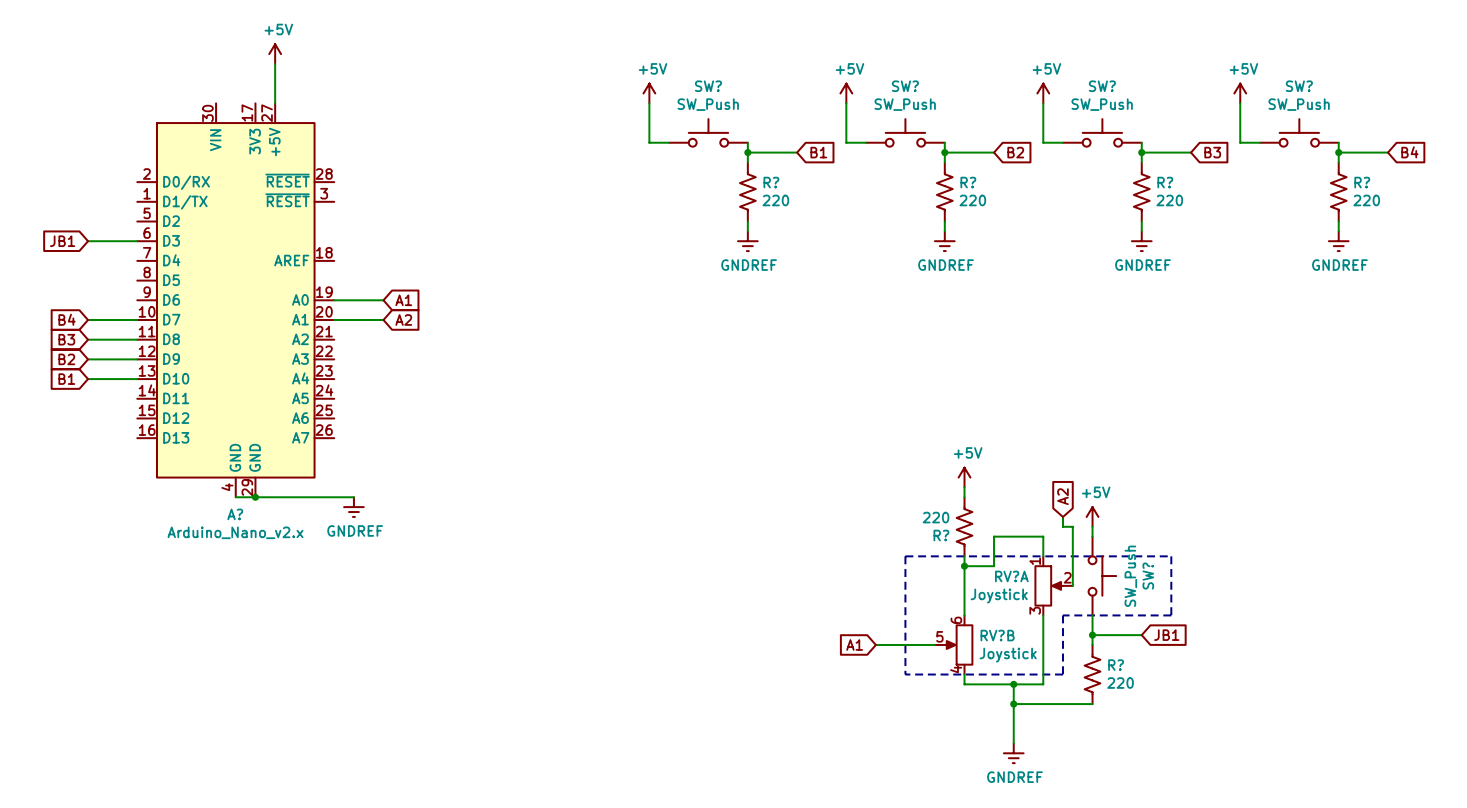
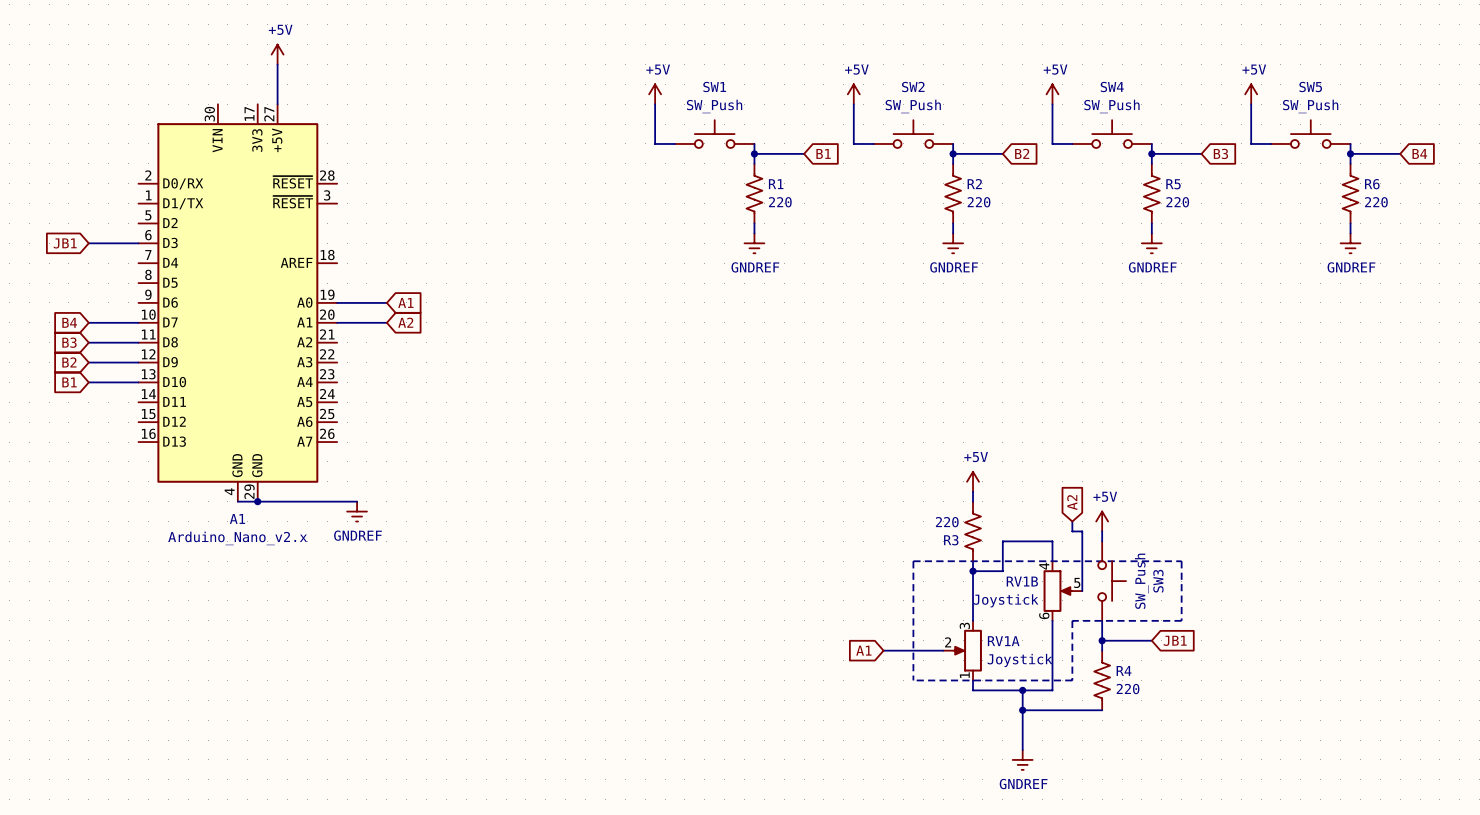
SW? name: SW? (708, 86) -> SW1 (714, 87)
SW? name: SW? (905, 86) -> SW2 (913, 87)
SW? name: SW? (1102, 86) -> SW4 (1112, 87)
SW? name: SW? (1299, 86) -> SW5 (1310, 87)
R? name: R? (771, 182) -> R1 (776, 184)
R? name: R? (968, 182) -> R2 (974, 184)
R? name: R? (1165, 182) -> R5 (1173, 184)
R? name: R? (1362, 182) -> R6 (1372, 184)
A? name: A? (235, 514) -> A1 (237, 518)
R? name: R? (941, 535) -> R3 (951, 540)
RV?A pin number: 1 (1035, 561) -> 4 (1044, 566)
RV?A name: RV?A (1011, 576) -> RV1B (1022, 581)
SW? name: SW? (1148, 576) -> SW3 (1158, 581)
RV?A pin number: 2 (1067, 577) -> 5 (1077, 582)
RV?A pin number: 3 (1035, 610) -> 6 (1044, 615)
RV?B pin number: 6 (956, 620) -> 3 (964, 625)
RV?B name: RV?B (997, 635) -> RV1A (1003, 641)
RV?B pin number: 5 (939, 636) -> 2 (948, 642)
R? name: R? (1116, 665) -> R4 (1124, 670)
RV?B pin number: 4 (956, 669) -> 1 (964, 675)

